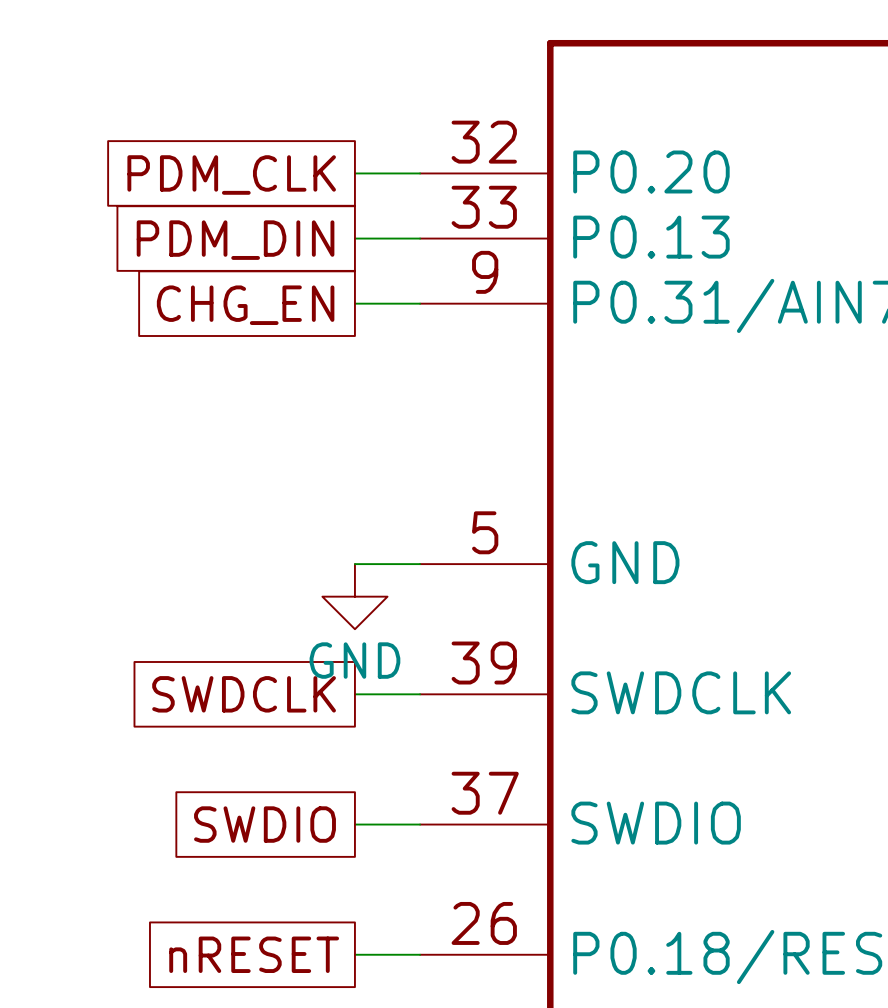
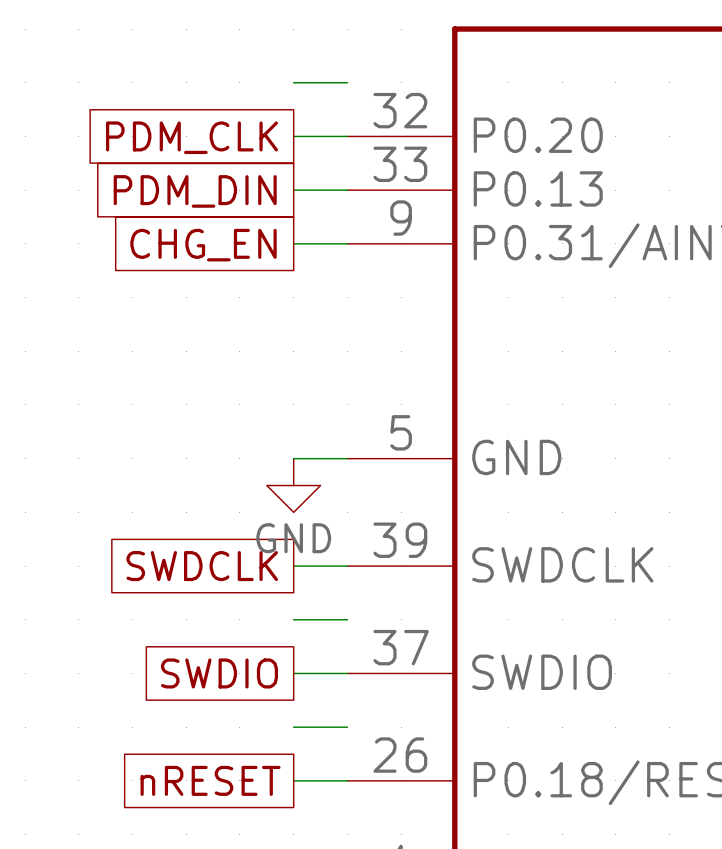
wire: none -> (293, 82) (347, 82)
wire: none -> (293, 619) (347, 619)
wire: none -> (293, 727) (347, 727)

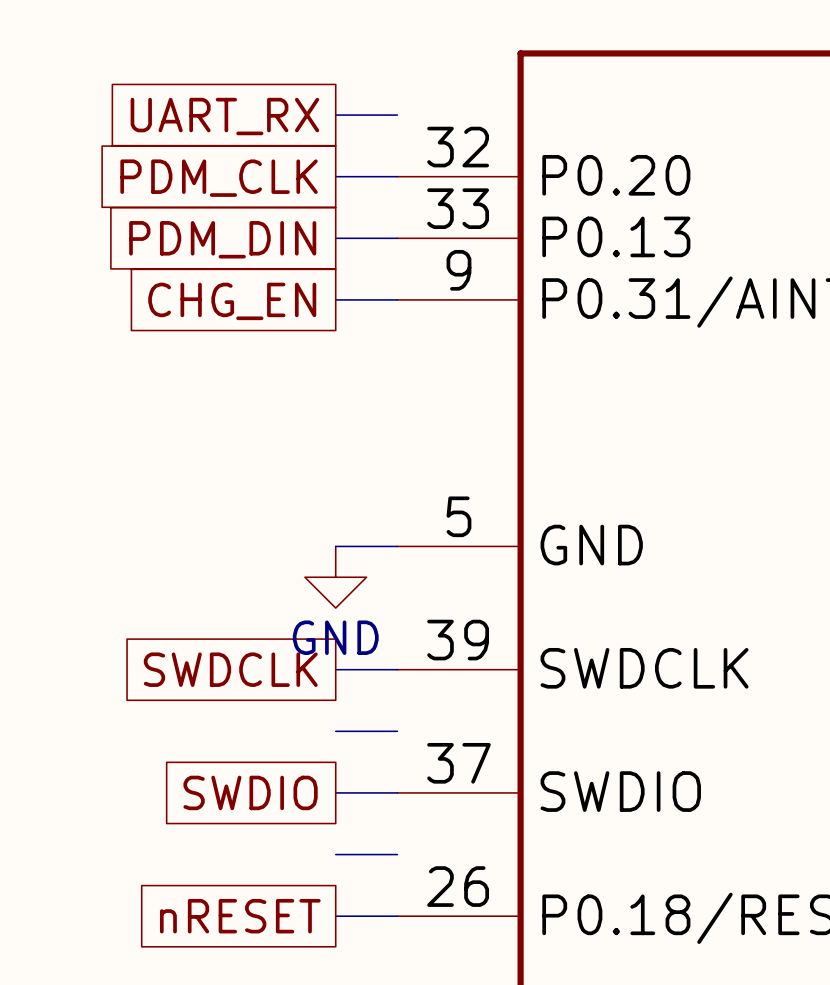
global label: none -> UART_RX (224, 116)

